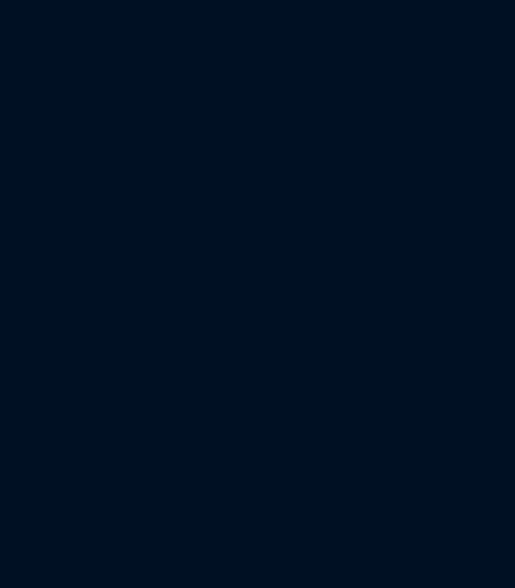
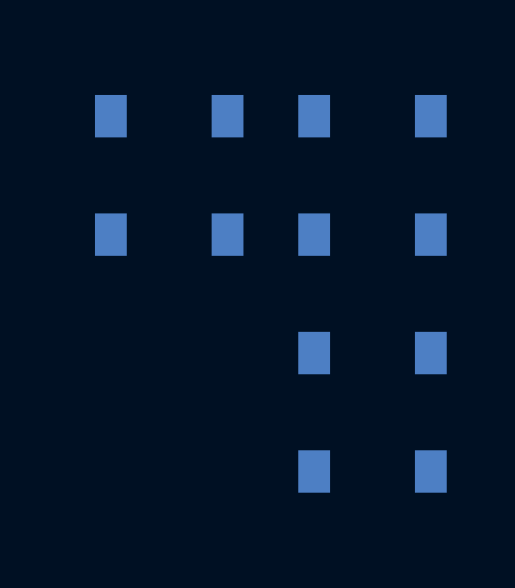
part: none -> (169, 116)
part: none -> (372, 116)
part: none -> (169, 234)
part: none -> (372, 234)
part: none -> (372, 353)
part: none -> (372, 471)

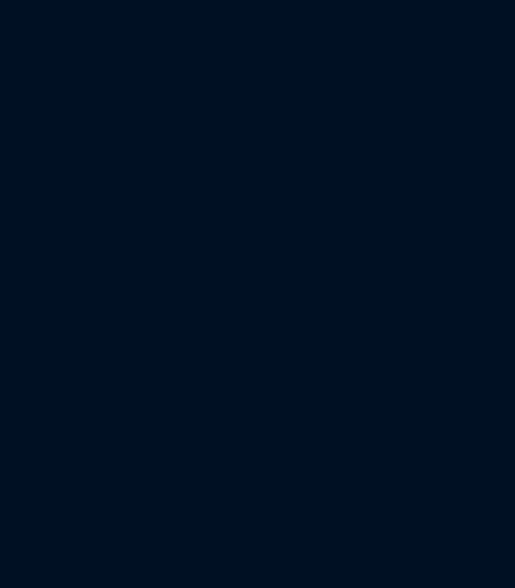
part: (169, 116) -> none
part: (372, 116) -> none
part: (169, 234) -> none
part: (372, 234) -> none
part: (372, 353) -> none
part: (372, 471) -> none

